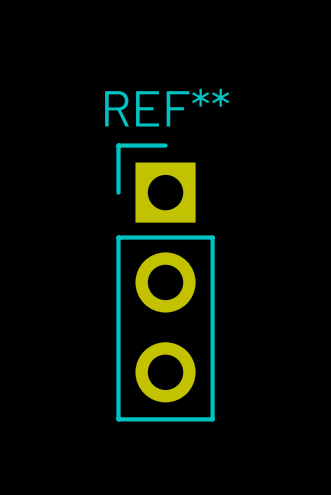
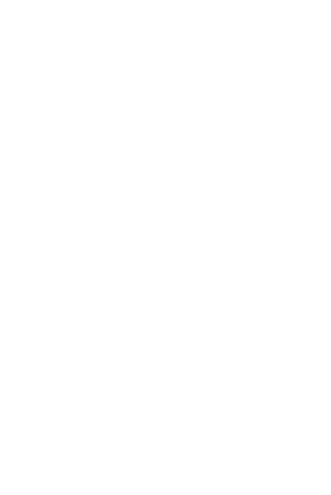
REF**: (165, 282) -> none

